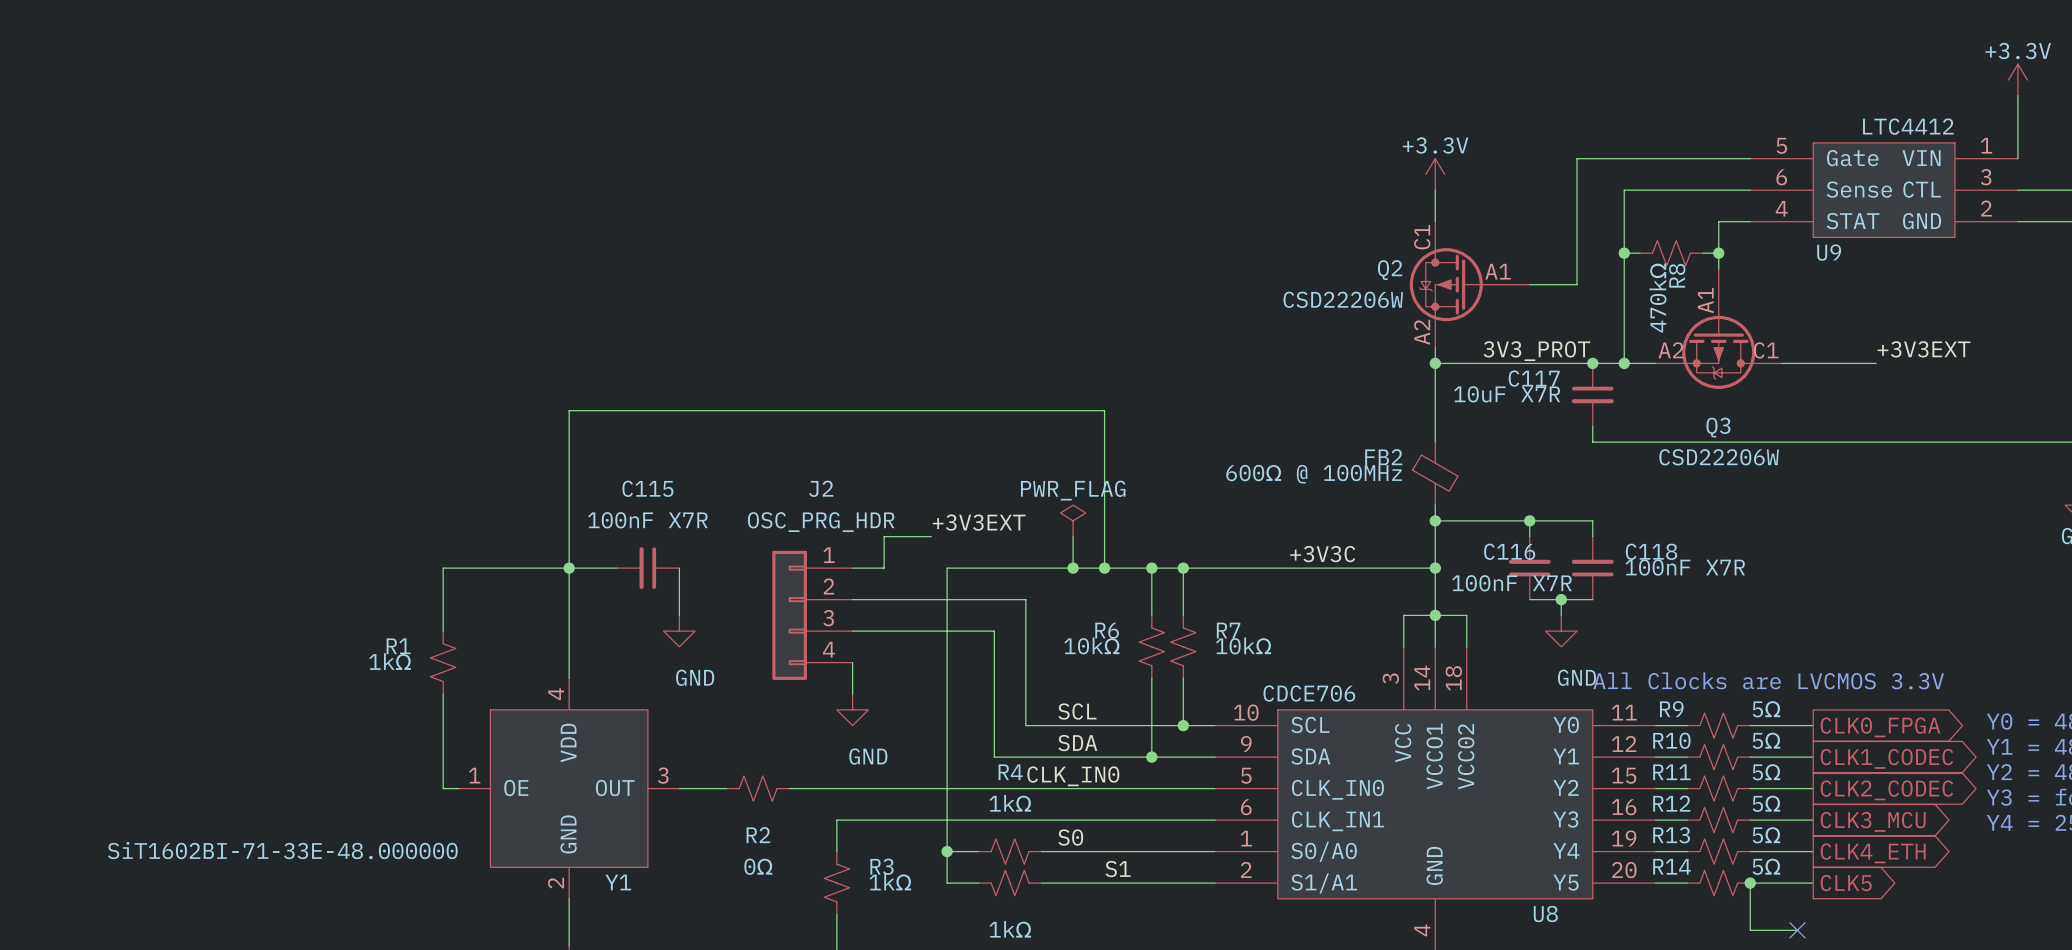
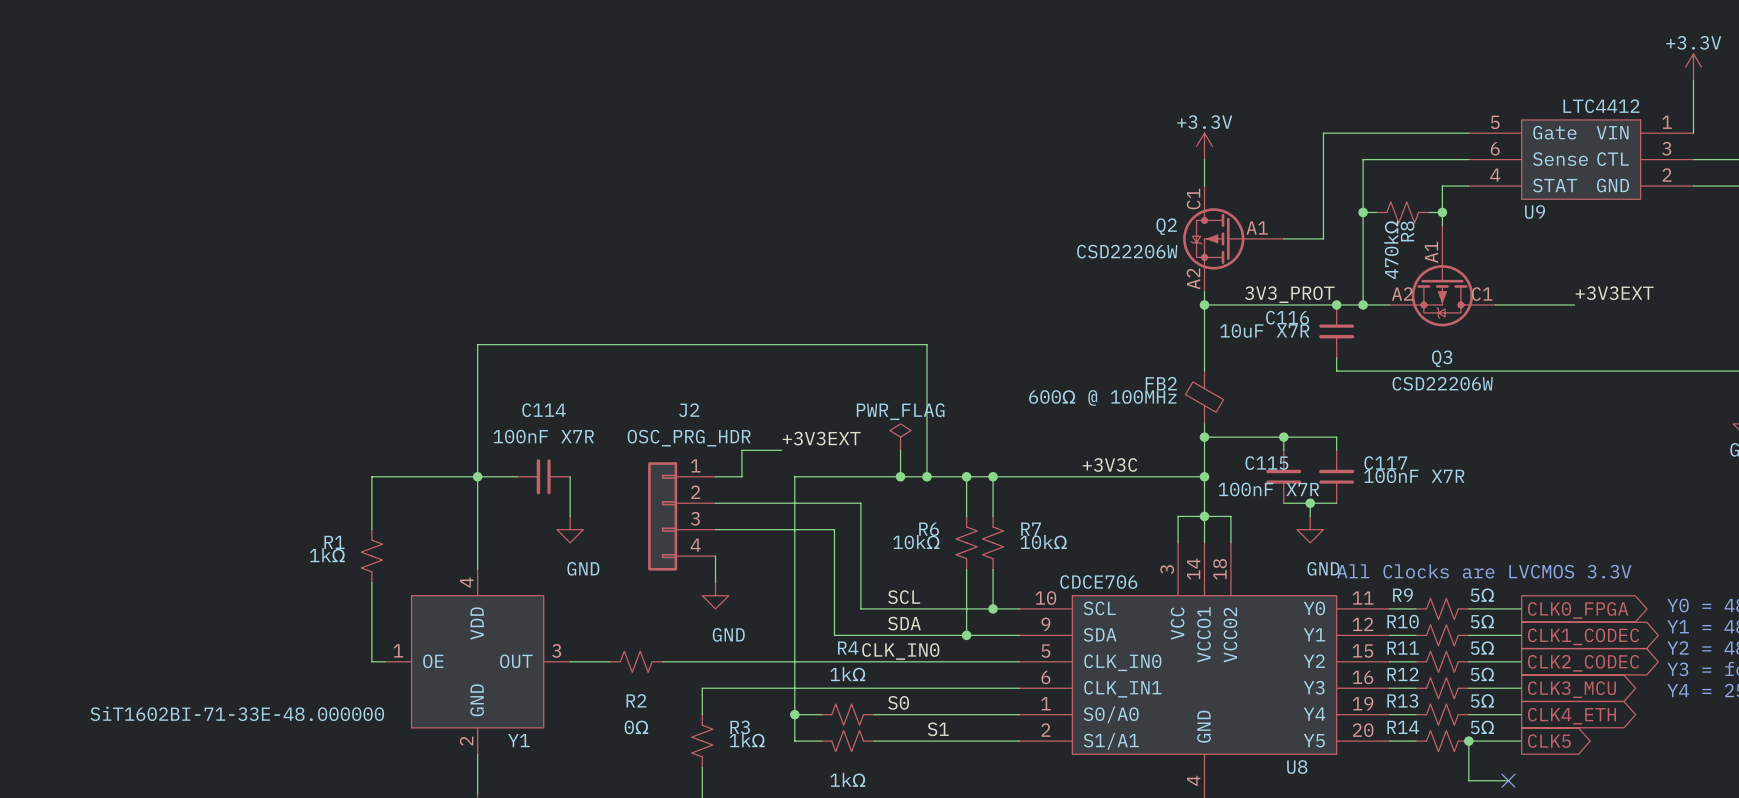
C117 name: C117 (1534, 378) -> C116 (1287, 317)
C115 name: C115 (647, 488) -> C114 (544, 410)
C116 name: C116 (1509, 551) -> C115 (1266, 463)
C118 name: C118 (1651, 551) -> C117 (1385, 463)

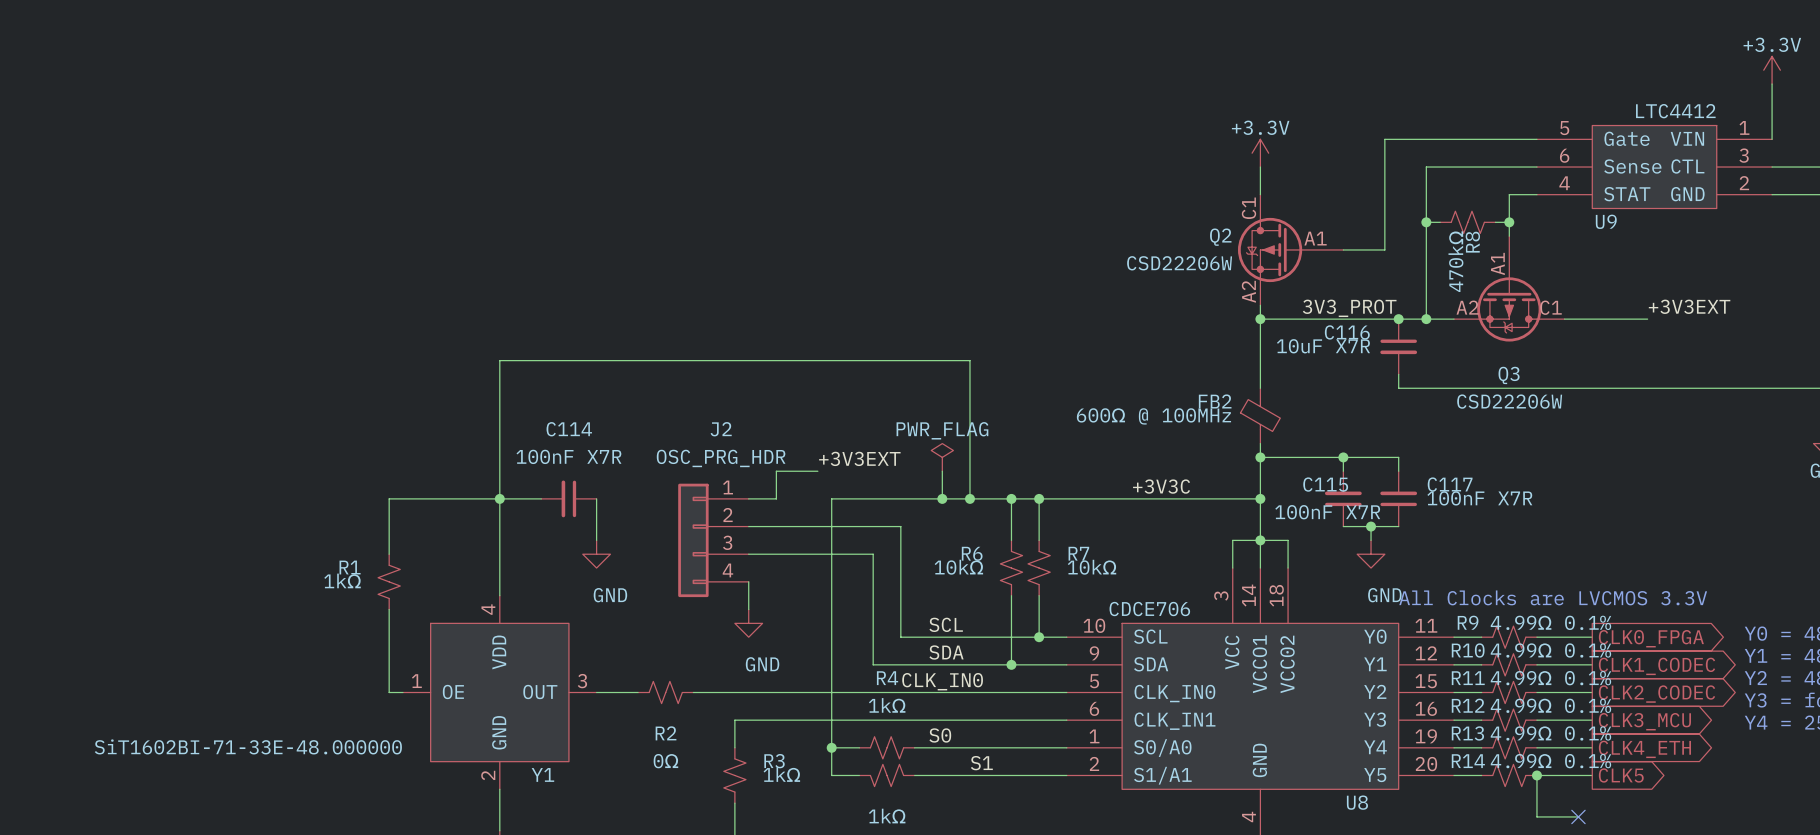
R9 value: 5Ω (1482, 595) -> 4.99Ω 0.1% (1550, 622)
R10 value: 5Ω (1482, 621) -> 4.99Ω 0.1% (1550, 650)
R11 value: 5Ω (1482, 648) -> 4.99Ω 0.1% (1550, 678)
R12 value: 5Ω (1482, 674) -> 4.99Ω 0.1% (1550, 705)
R13 value: 5Ω (1482, 700) -> 4.99Ω 0.1% (1550, 733)
R14 value: 5Ω (1482, 727) -> 4.99Ω 0.1% (1550, 761)

